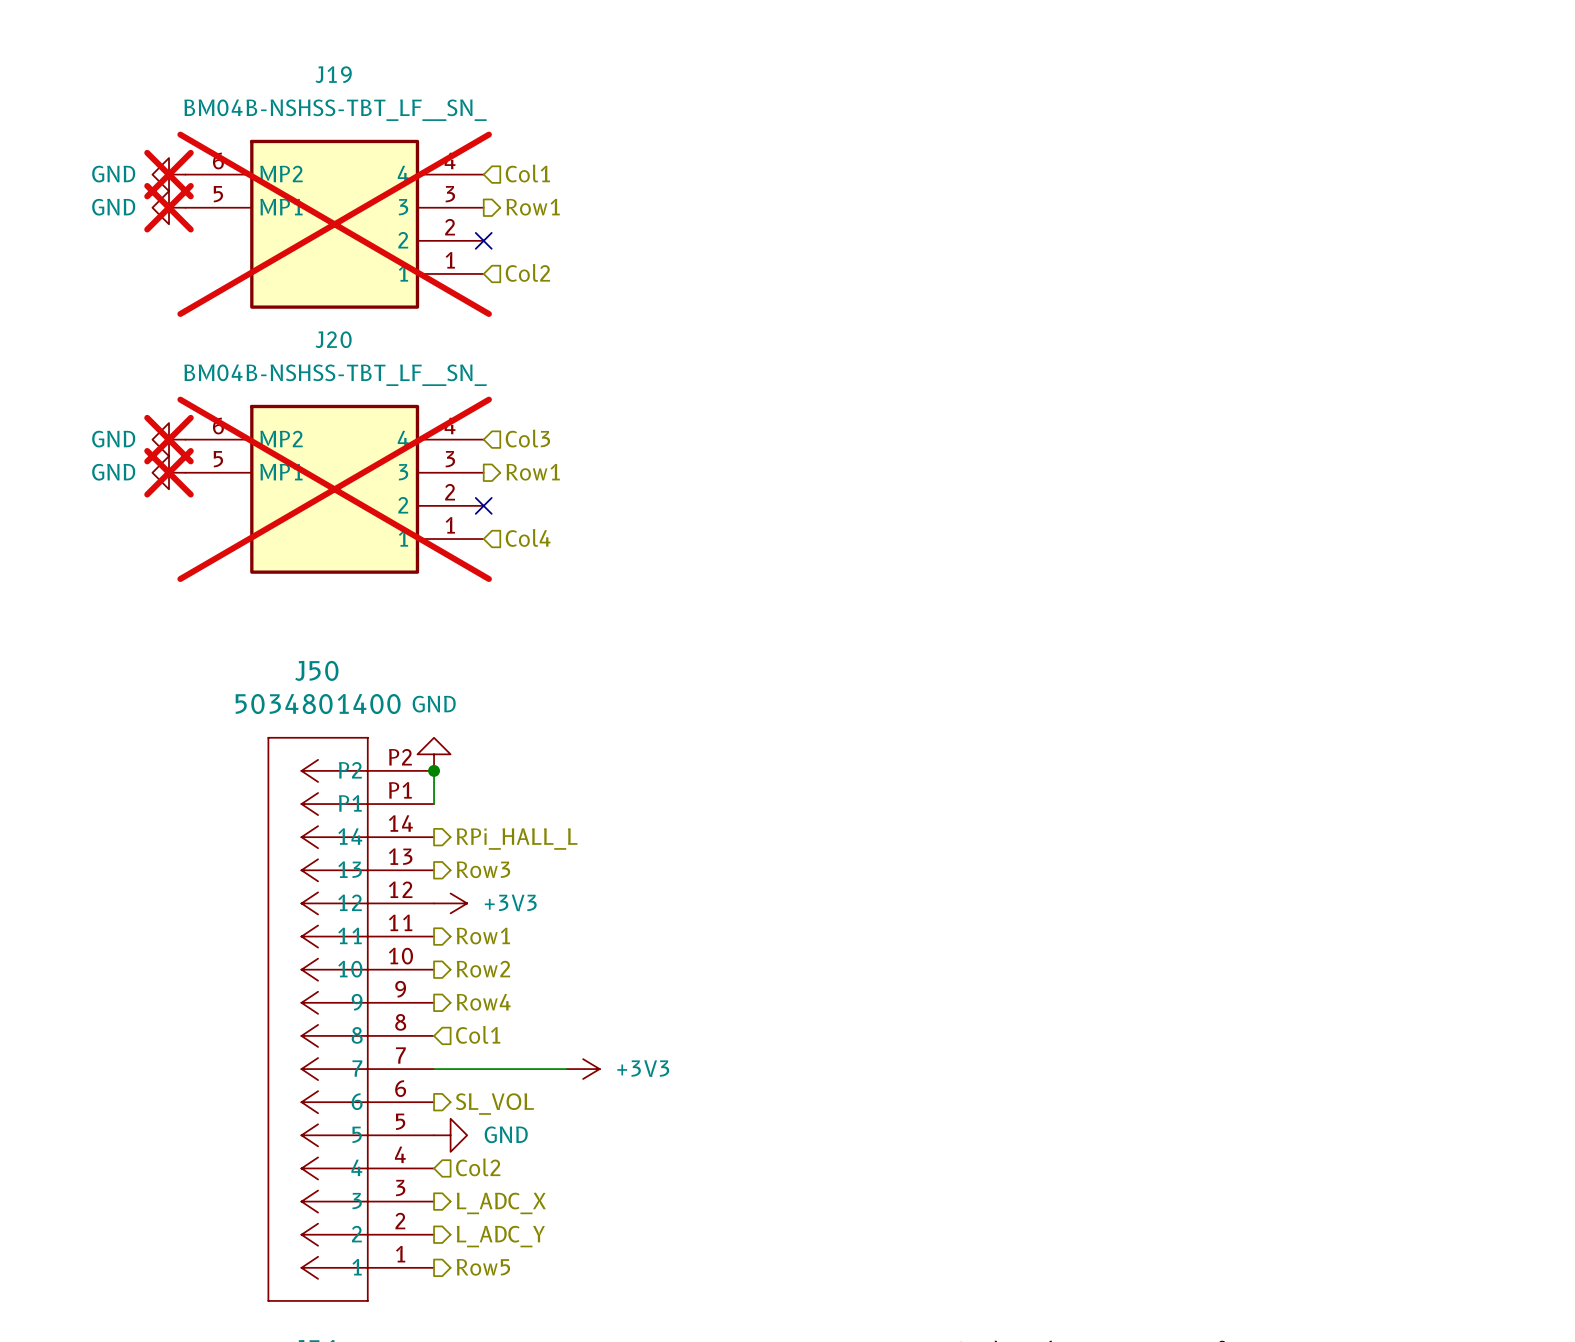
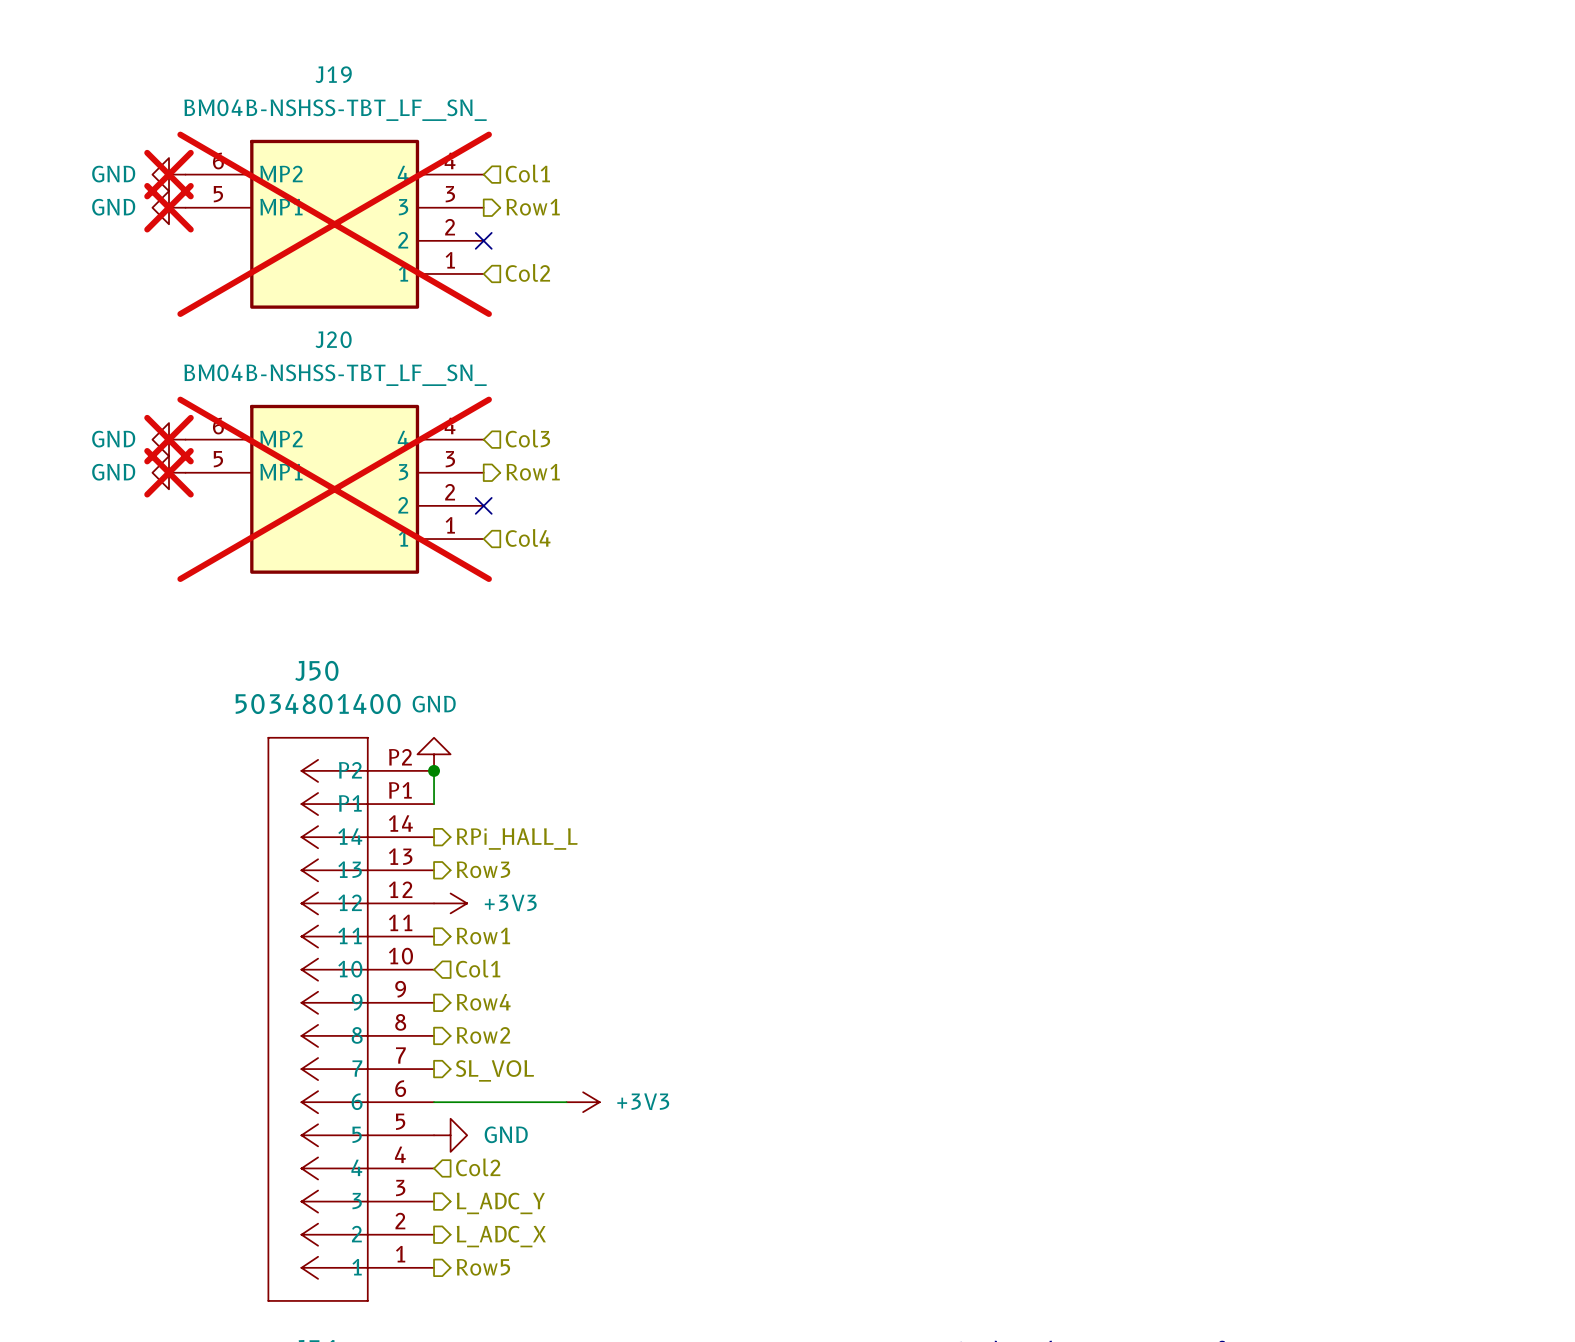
hierarchical label shape: output (483, 969) -> input (478, 968)
hierarchical label: Row2 (483, 969) -> Col1 (478, 968)
hierarchical label shape: input (478, 1034) -> output (483, 1035)
hierarchical label: Col1 (478, 1034) -> Row2 (483, 1035)
wire: (434, 1069) (566, 1069) -> (434, 1102) (566, 1102)
power symbol position: +3V3 (583, 1069) -> +3V3 (583, 1102)
hierarchical label position: SL_VOL (494, 1104) -> SL_VOL (494, 1070)
hierarchical label: L_ADC_X (501, 1203) -> L_ADC_Y (500, 1203)
hierarchical label: L_ADC_Y (500, 1236) -> L_ADC_X (501, 1236)

